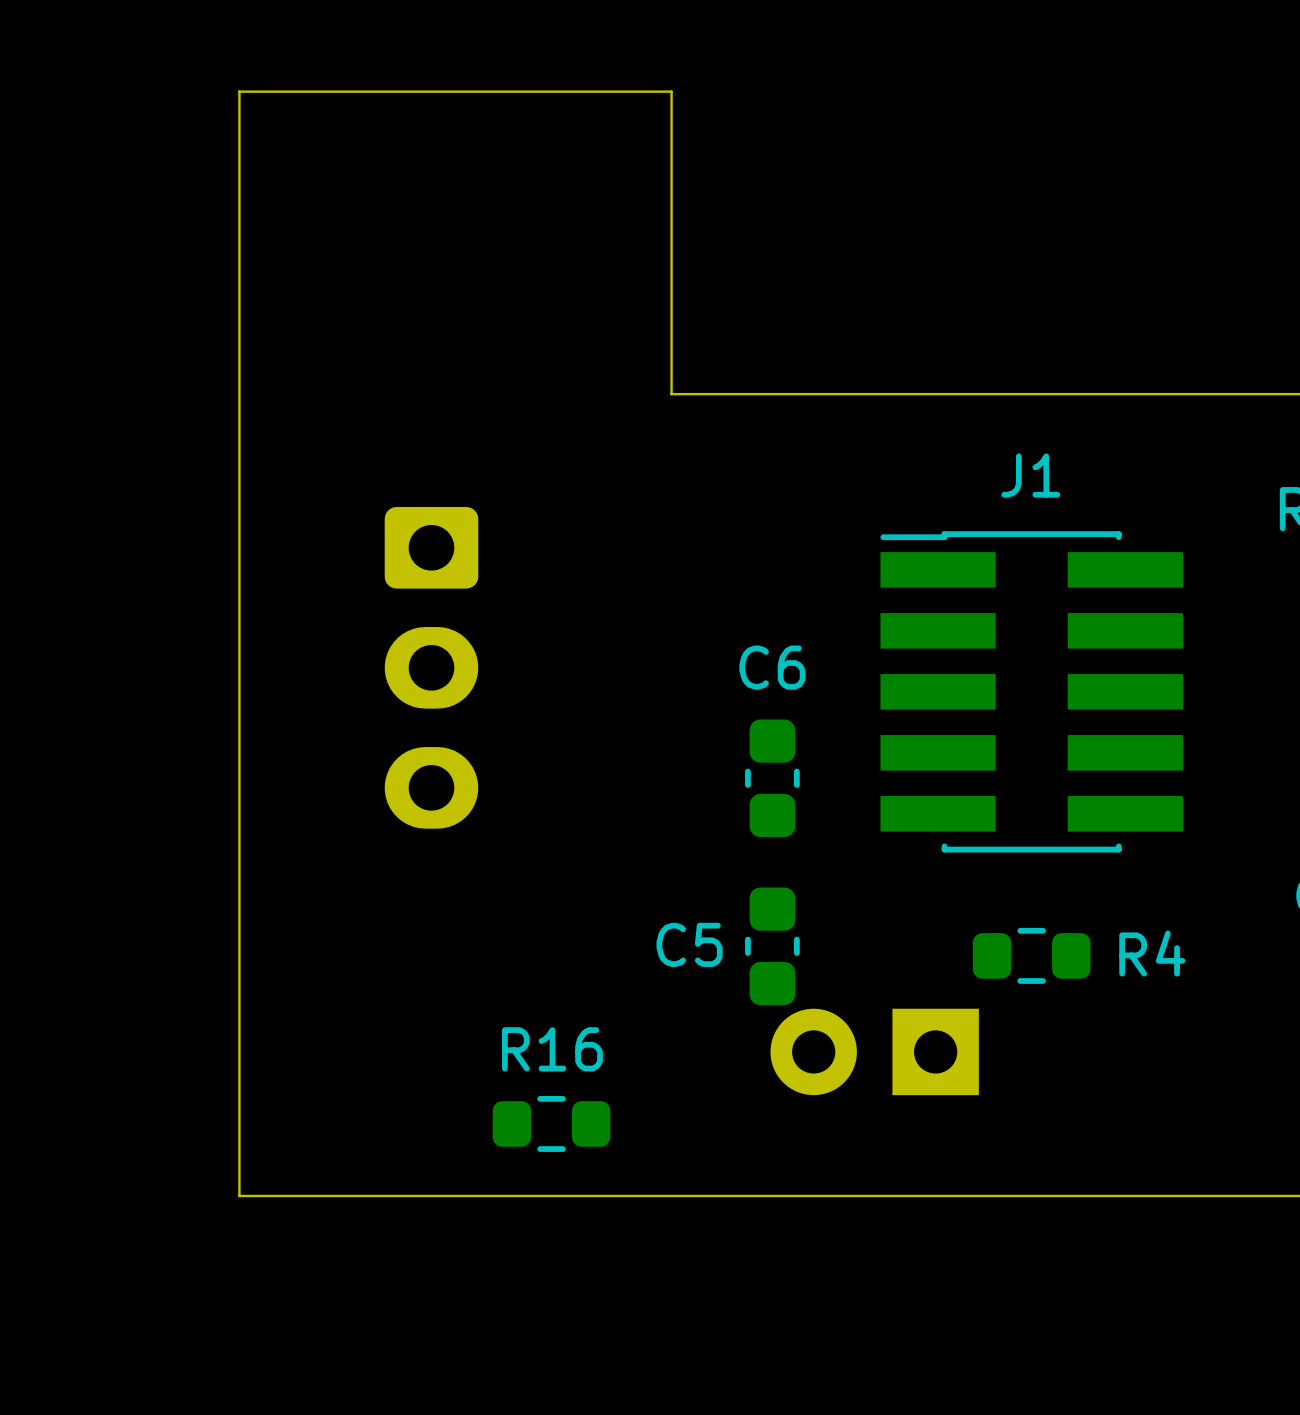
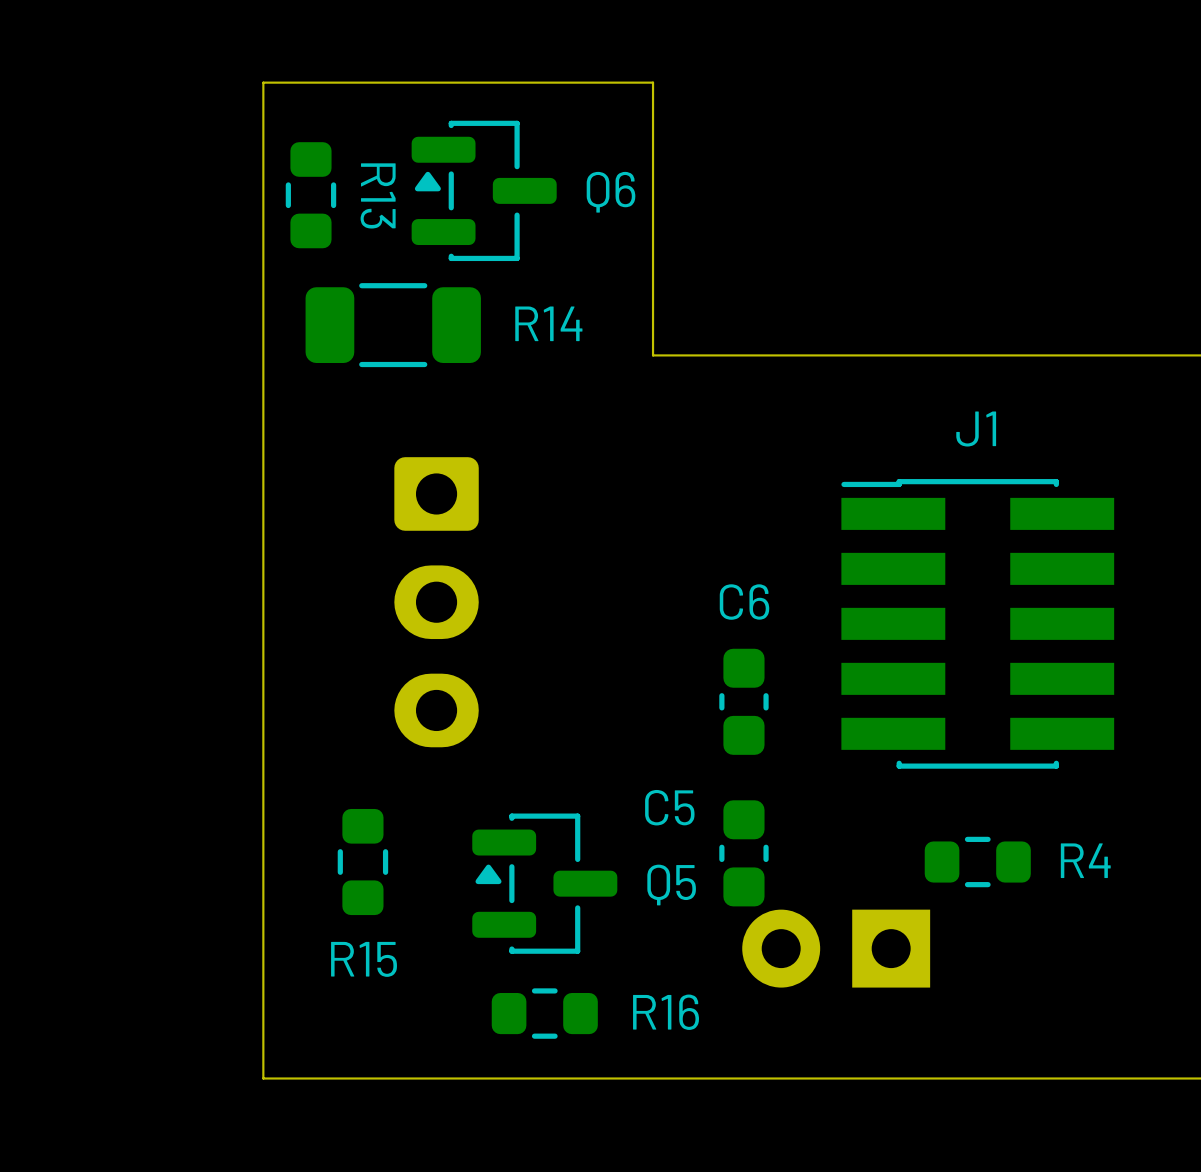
Q6: none -> (484, 190)
R13: none -> (310, 195)
R14: none -> (393, 325)
C5 name position: C5 (689, 944) -> C5 (669, 807)
R15: none -> (362, 862)
Q5: none -> (544, 883)
R16 name position: R16 (552, 1049) -> R16 (666, 1012)

